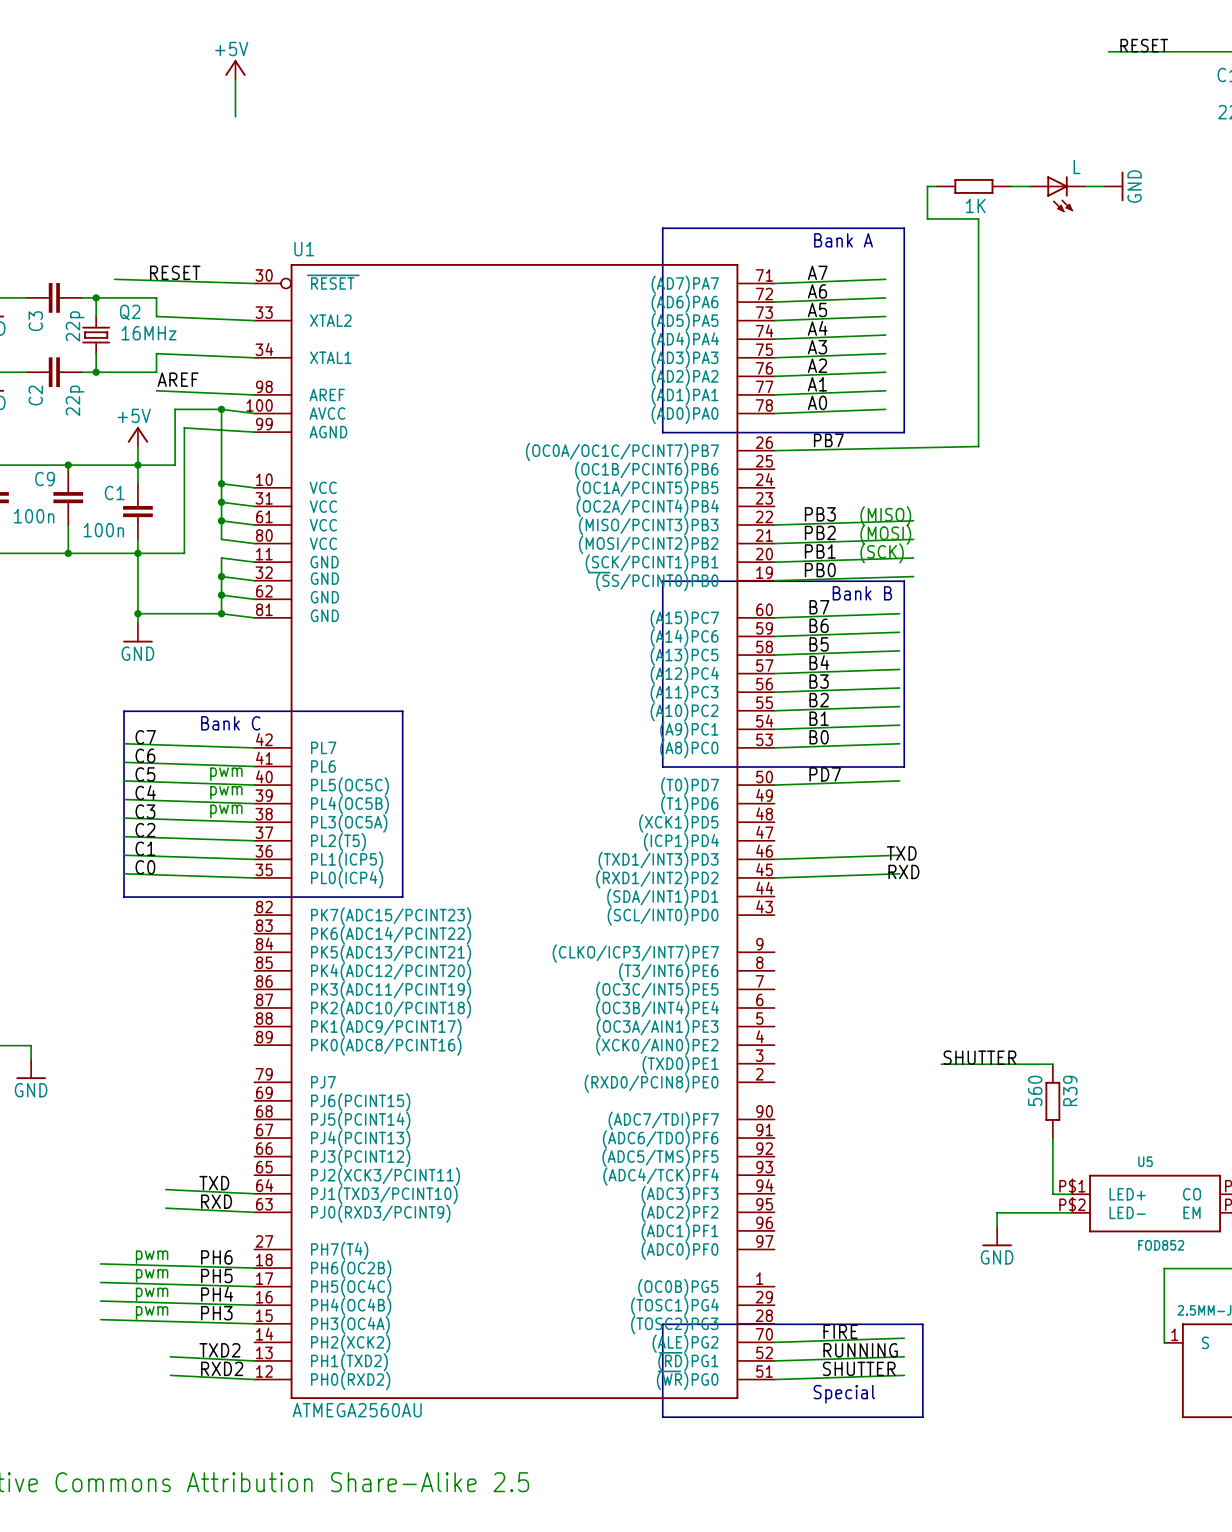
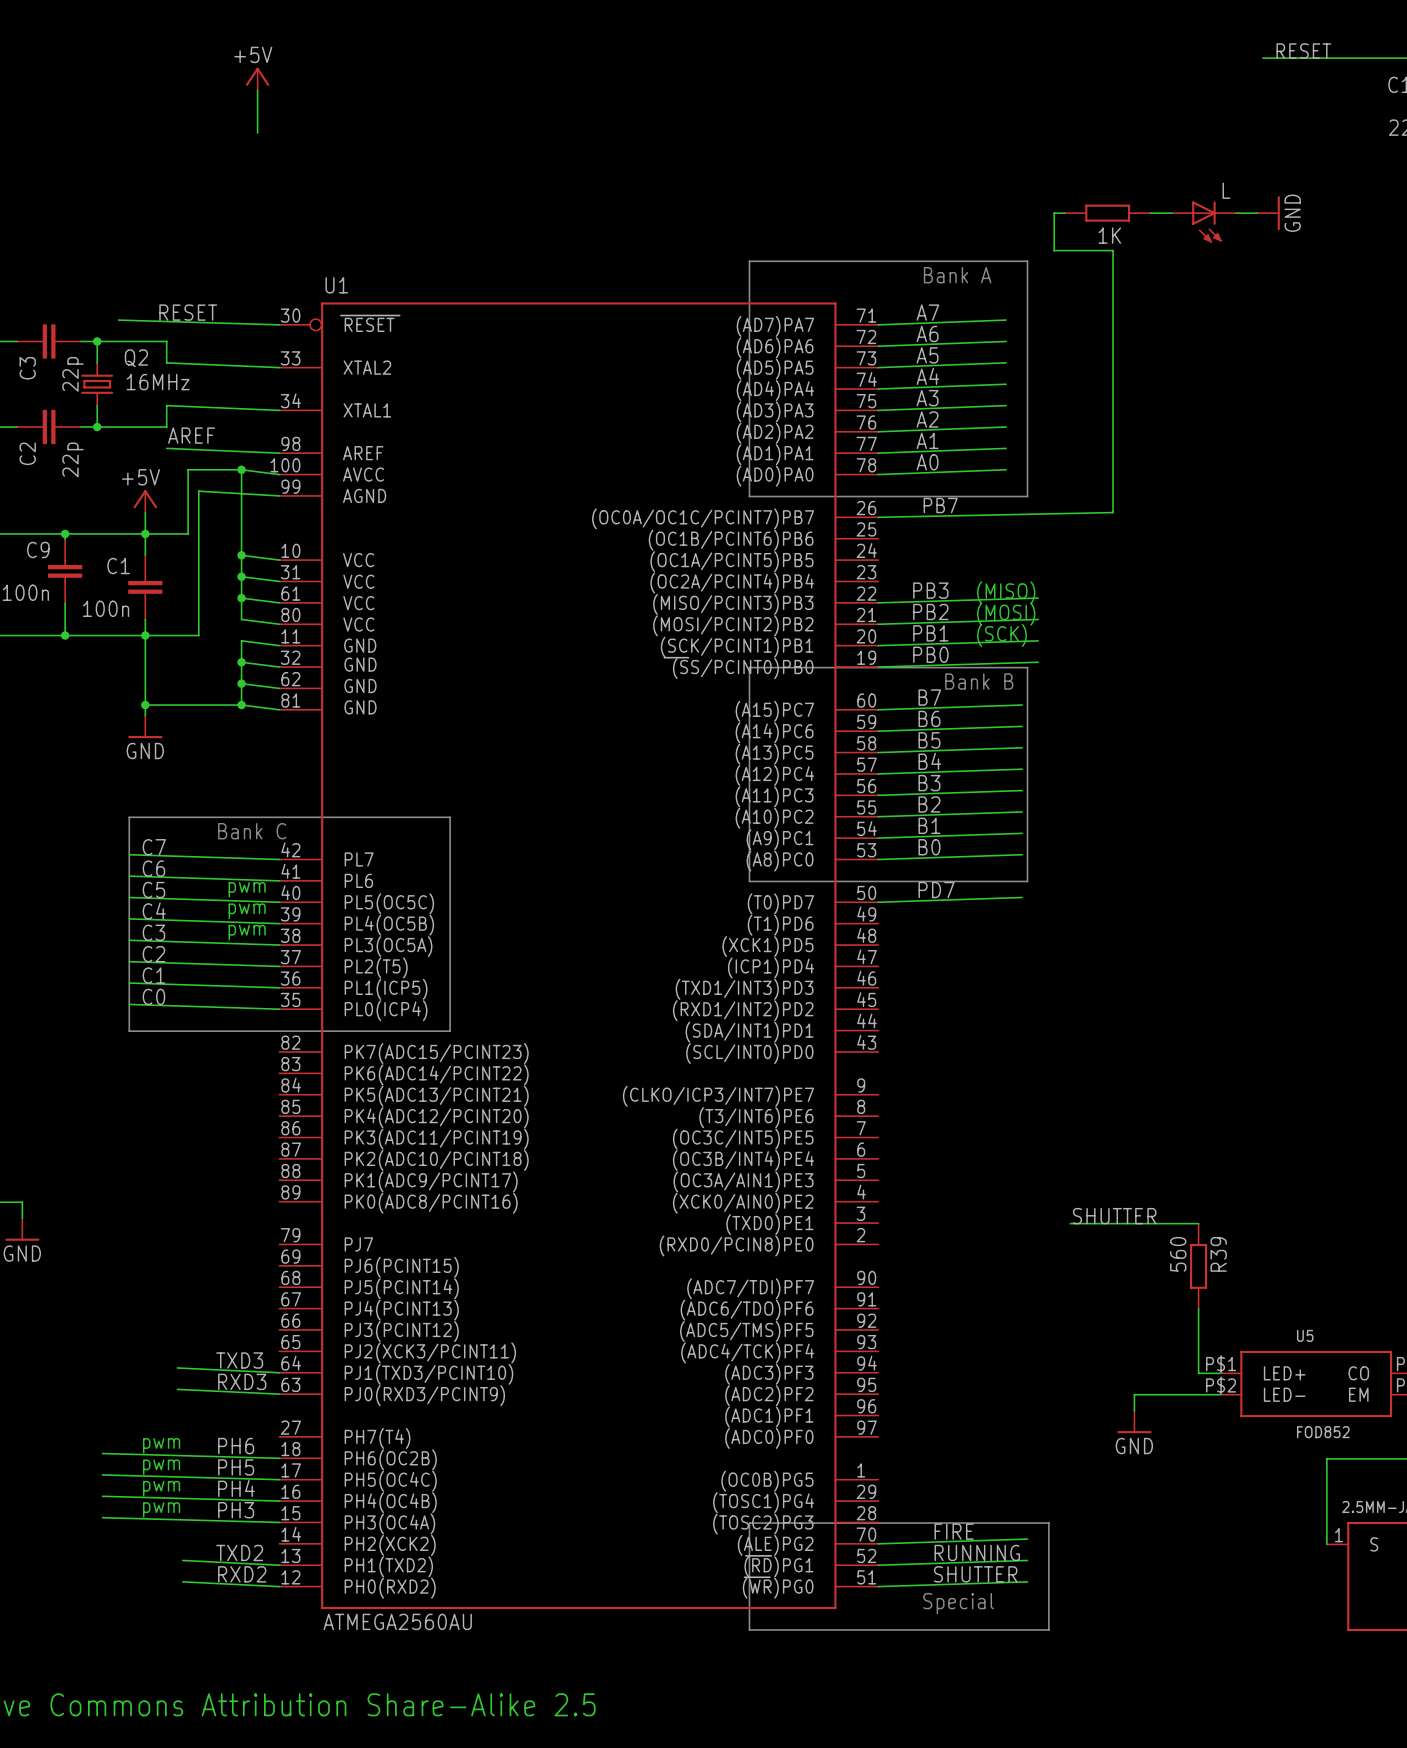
label: TXD (901, 853) -> none
wire: (899, 855) (774, 859) -> none
label: RXD (903, 871) -> none
wire: (899, 873) (774, 877) -> none
label: TXD (214, 1183) -> TXD3 (239, 1360)
label: RXD (216, 1201) -> RXD3 (242, 1381)

